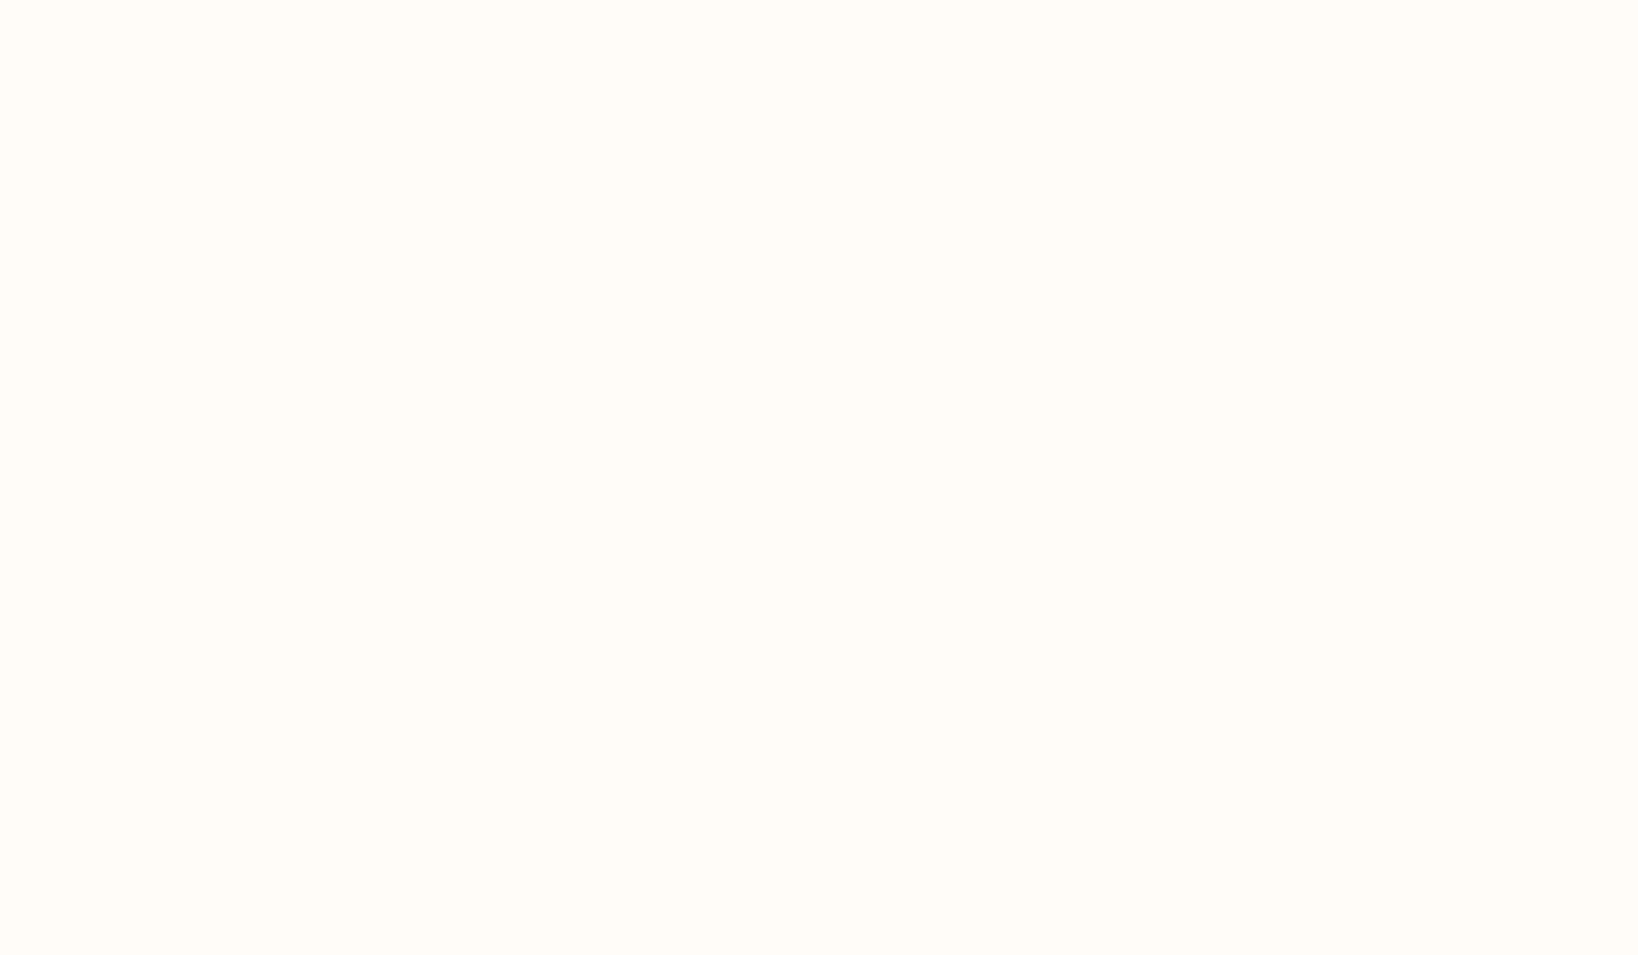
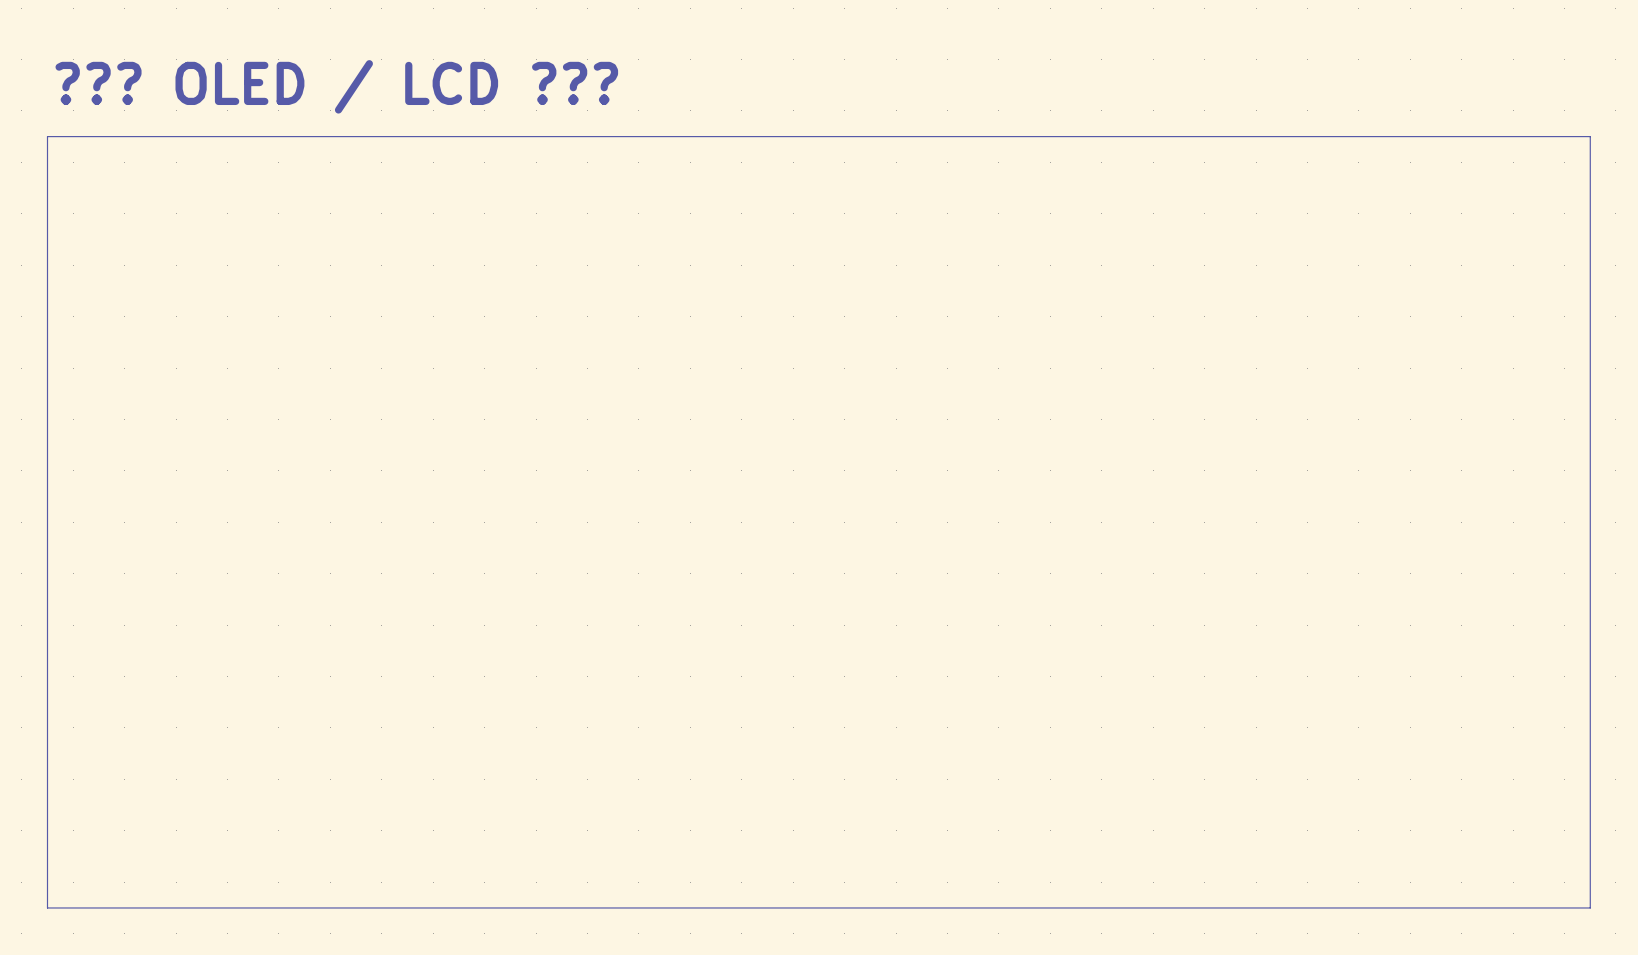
text: none -> ??? OLED / LCD ??? (336, 86)
line: none -> (47, 136) (1590, 136) (1590, 907) (47, 907) (47, 136)

